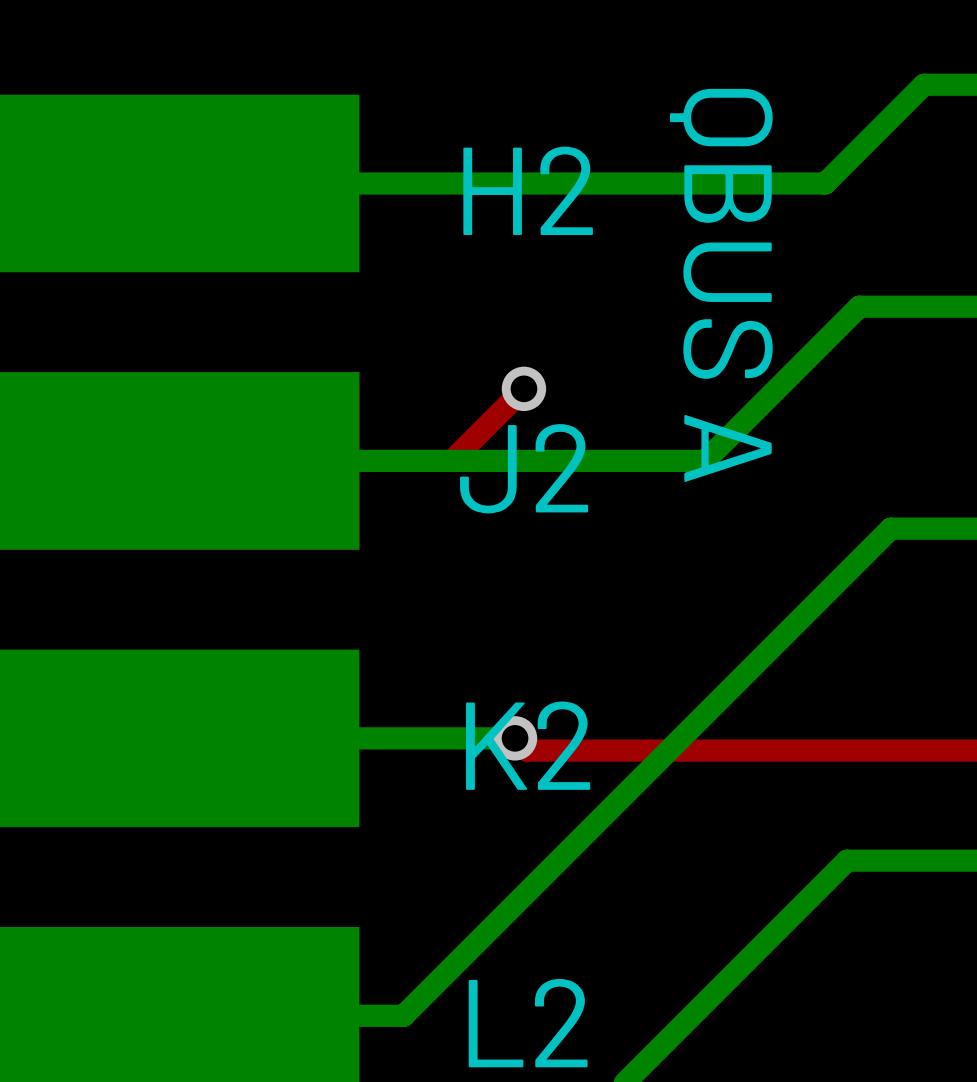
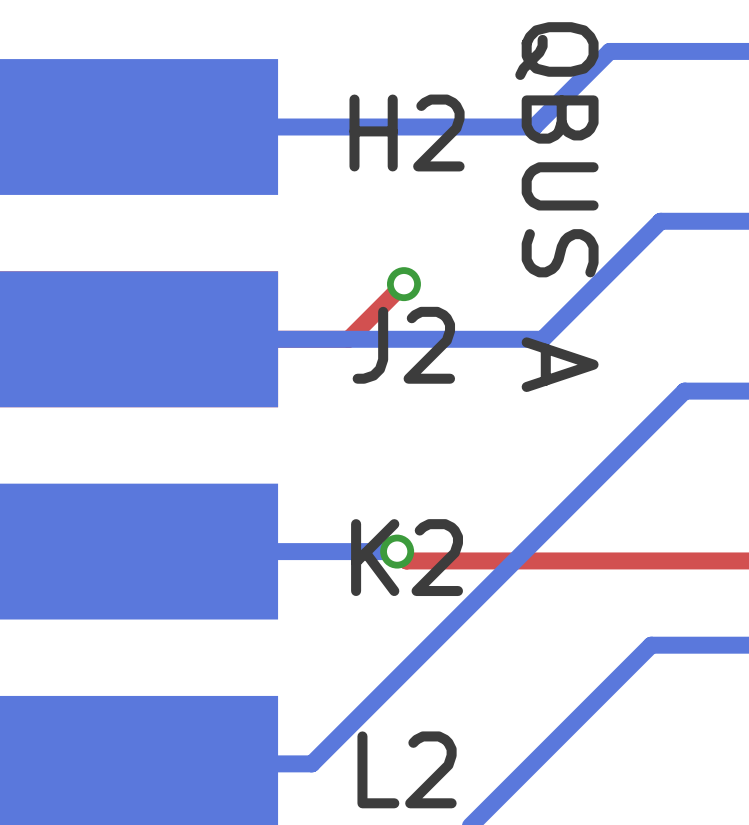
bottom track: (923, 84) (825, 183) (694, 183) -> (710, 51) (609, 51) (534, 127)

